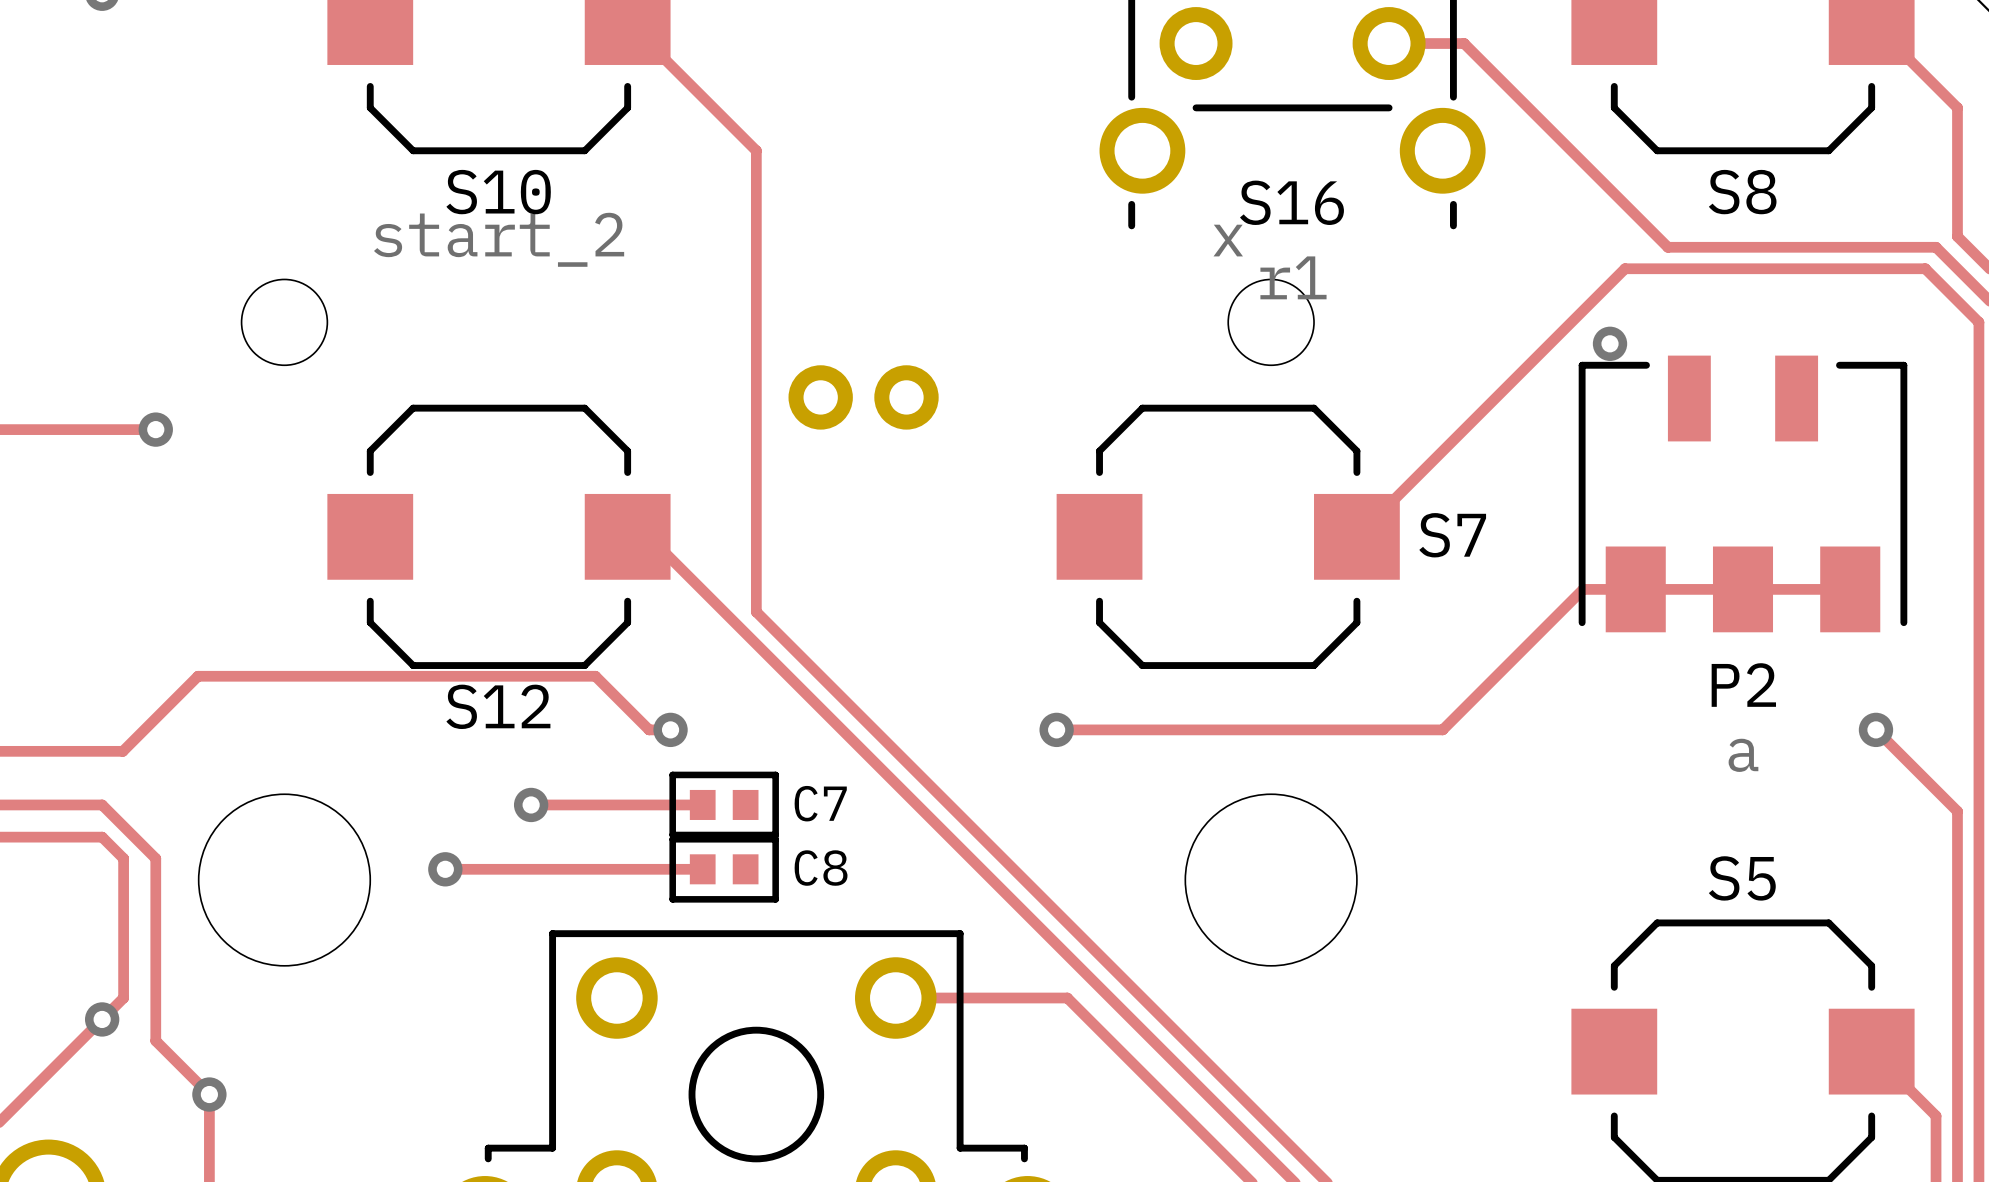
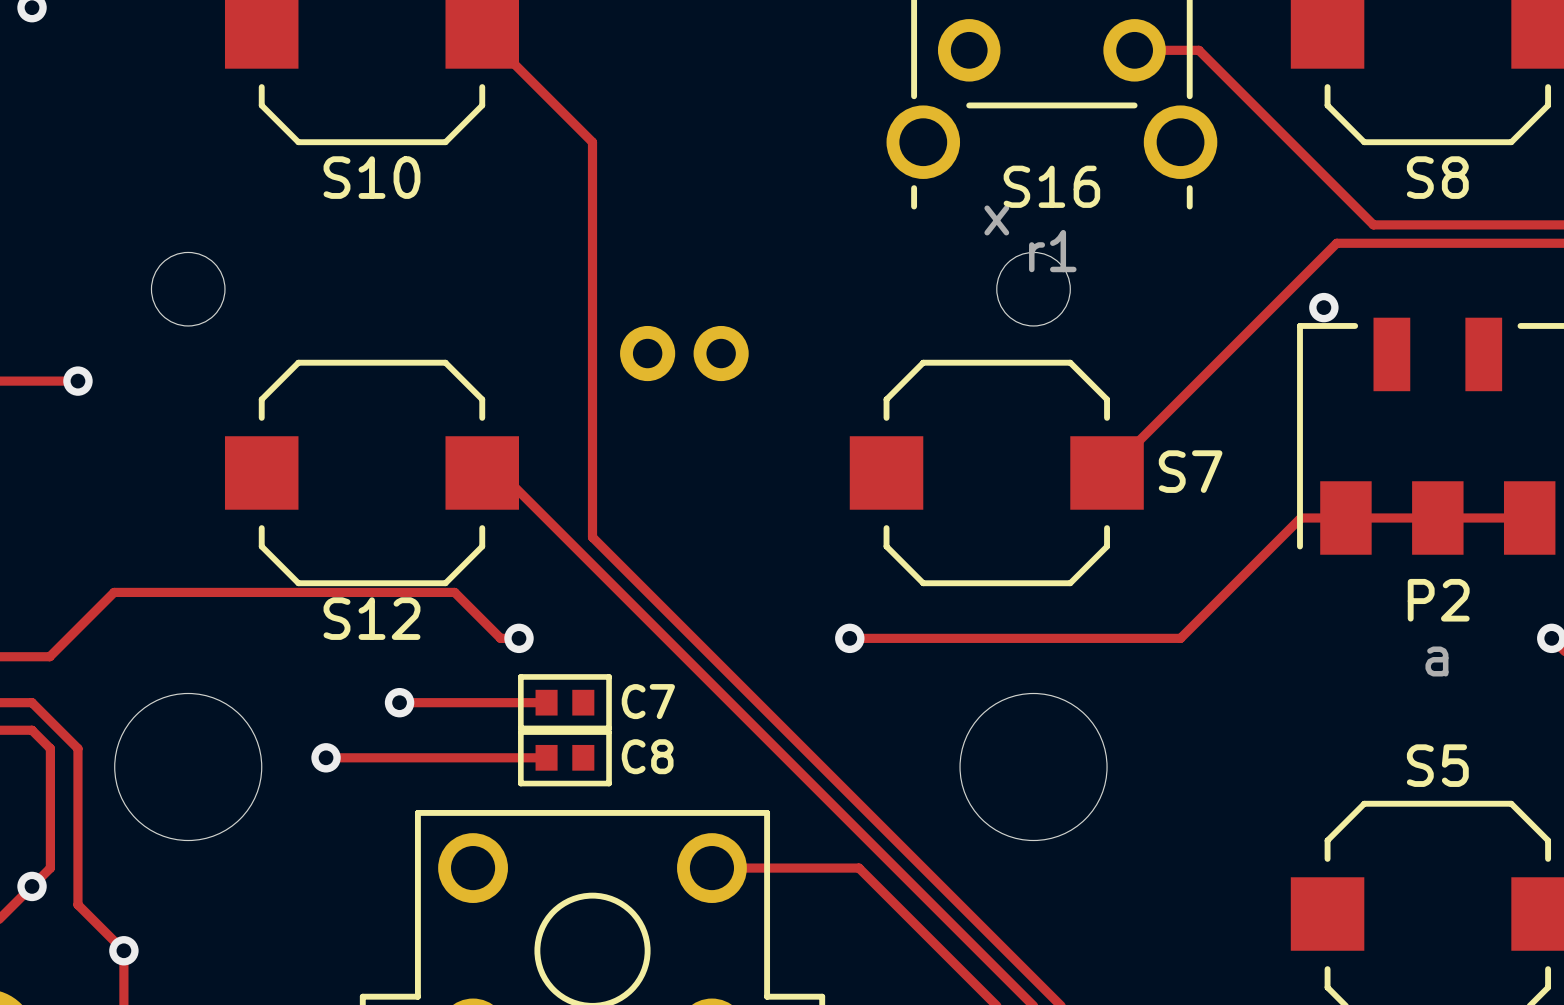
S12 value: start_2 (499, 239) -> none

